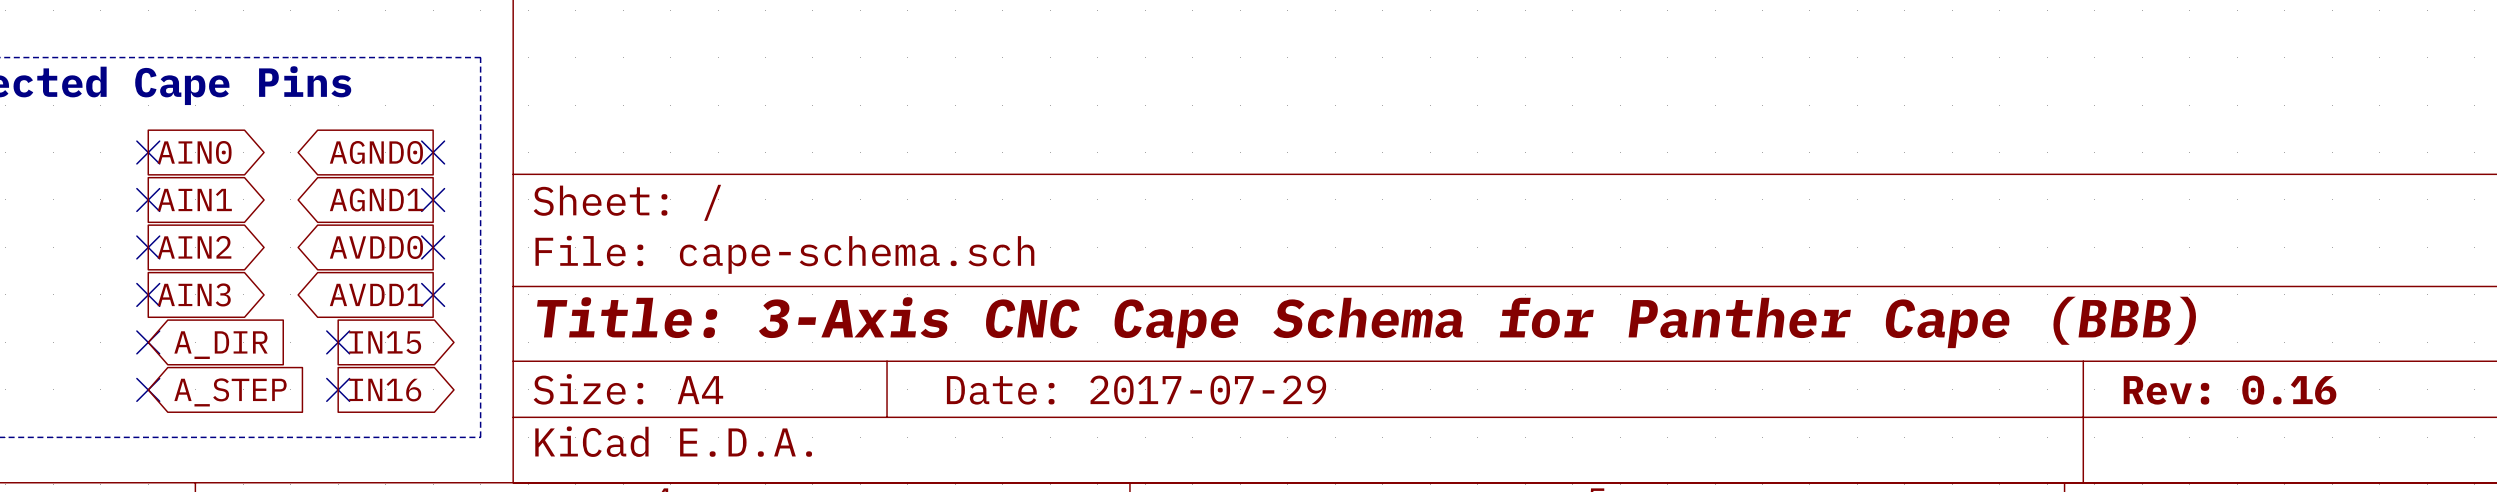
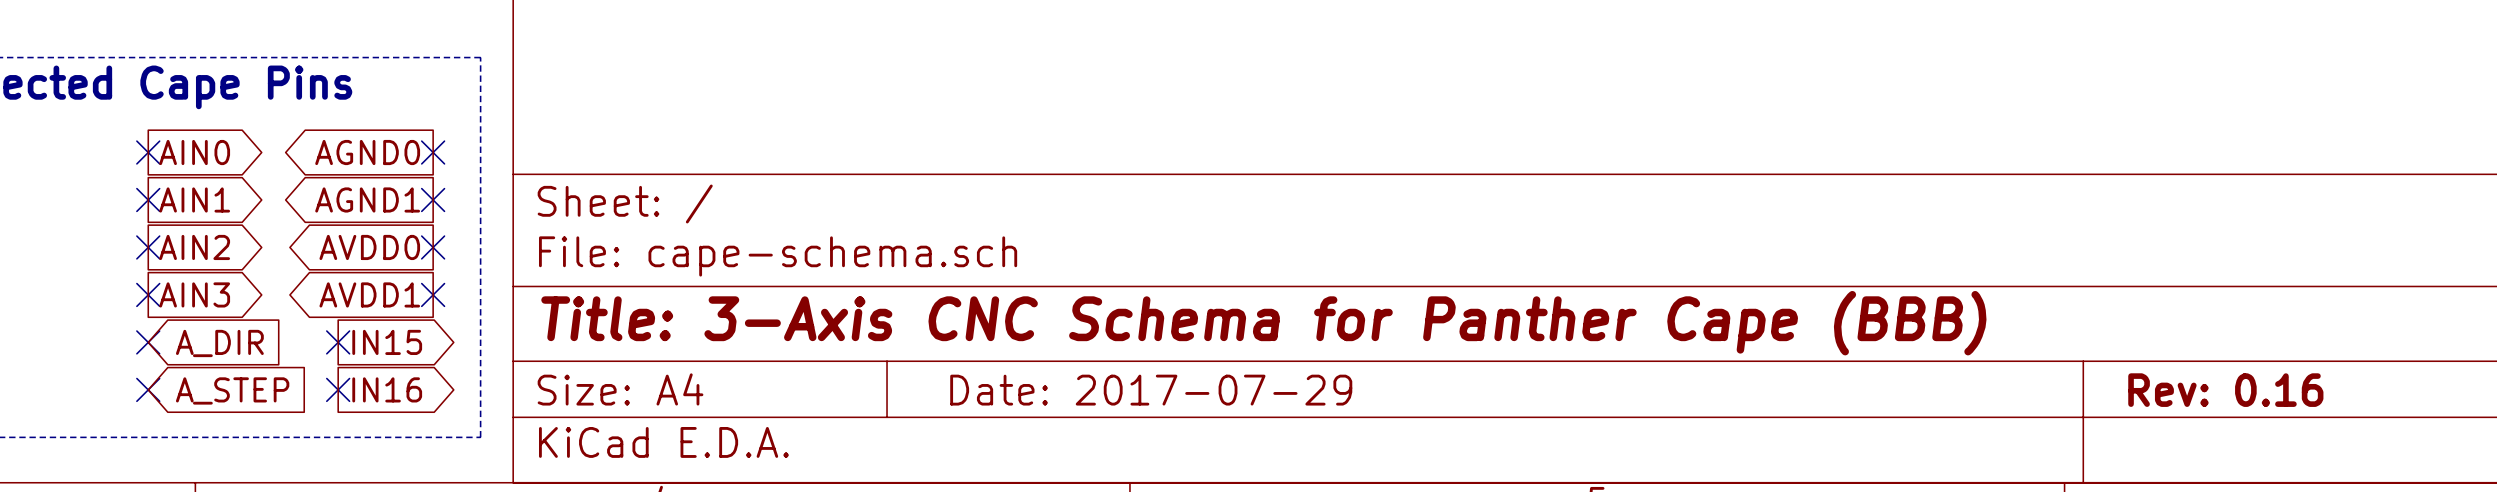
title block: Title: 3-Axis CNC Cape Schema for Panther Cape (BBB) (1366, 322) -> Title: 3-Axis CNC Schema for Panther Cape (BBB) (1263, 323)

